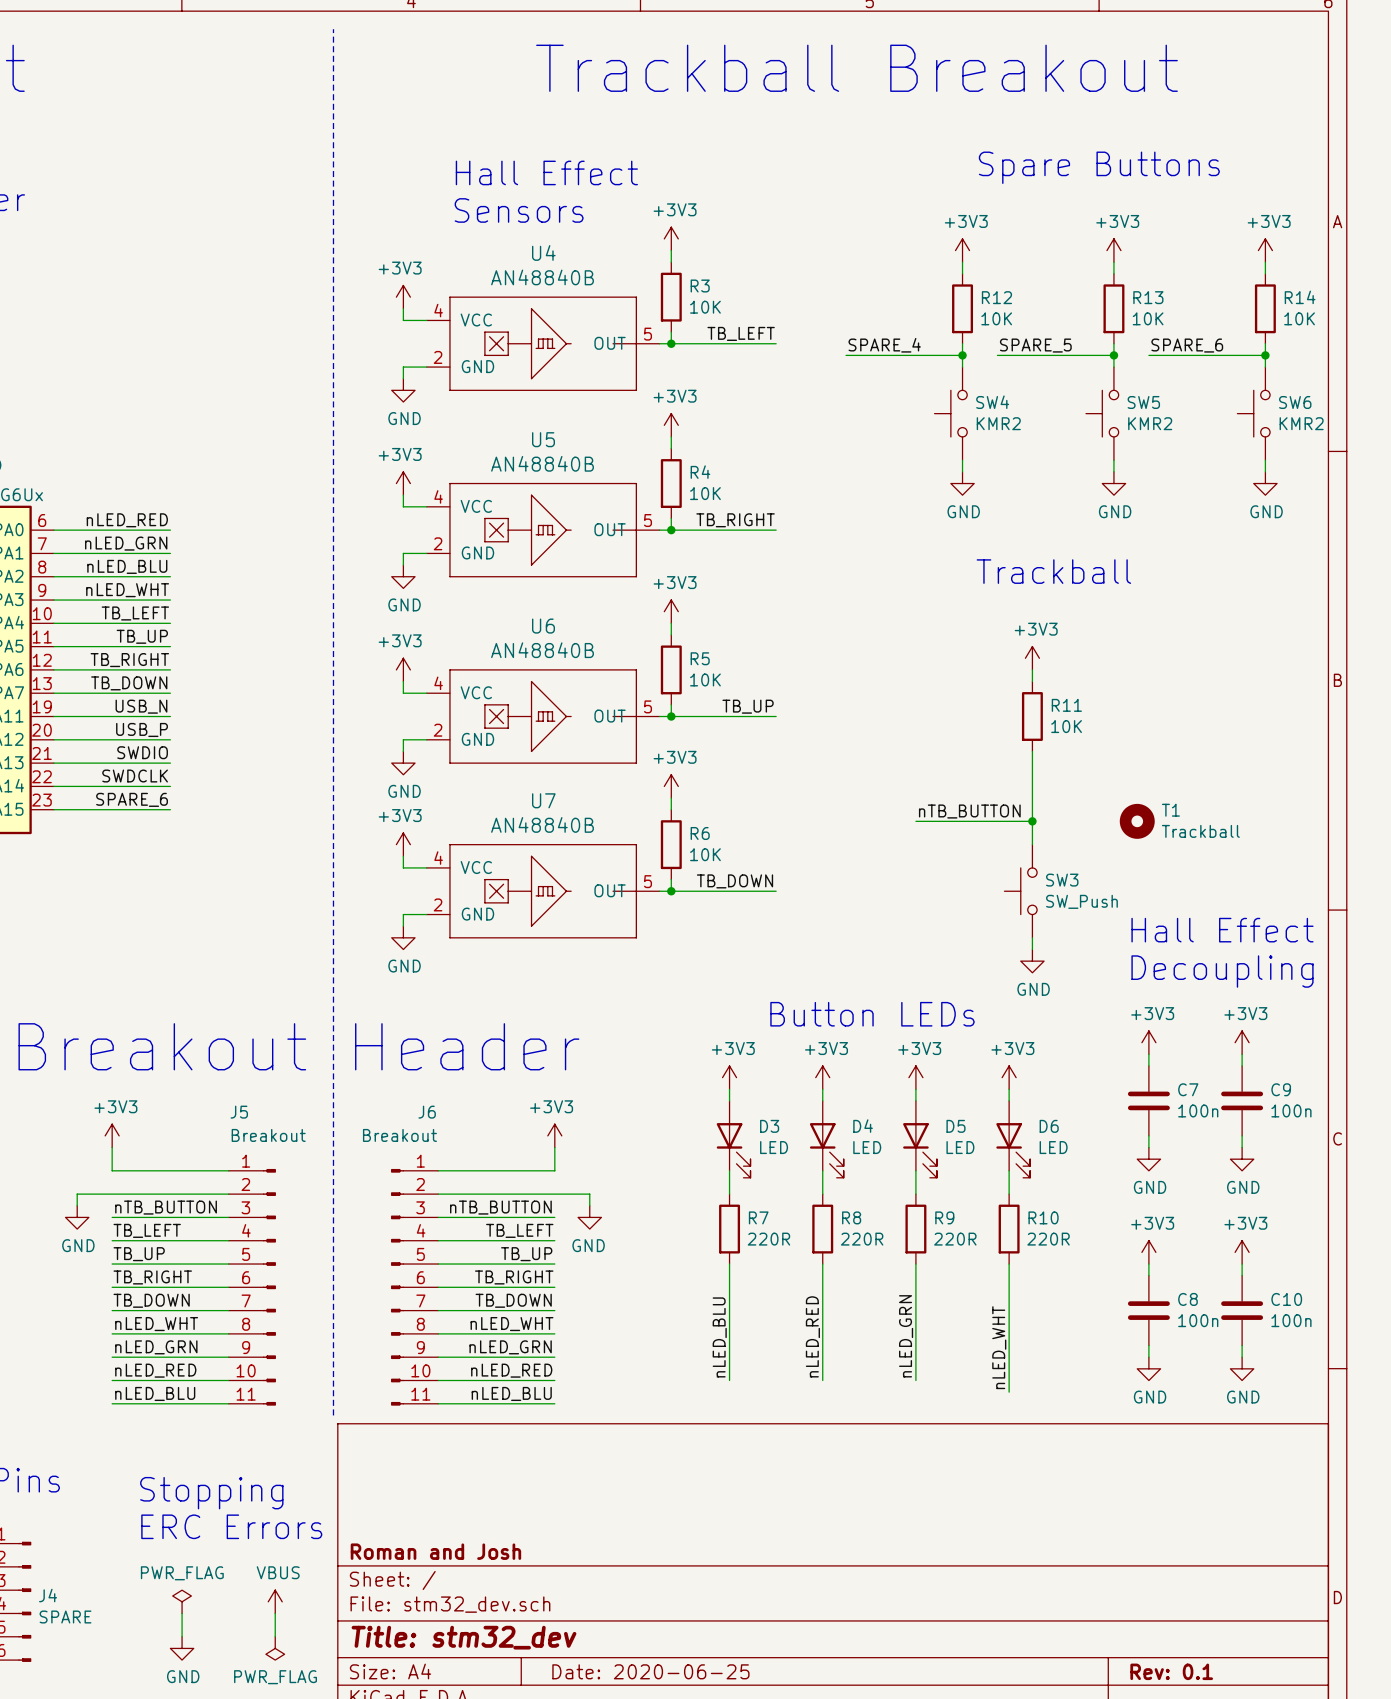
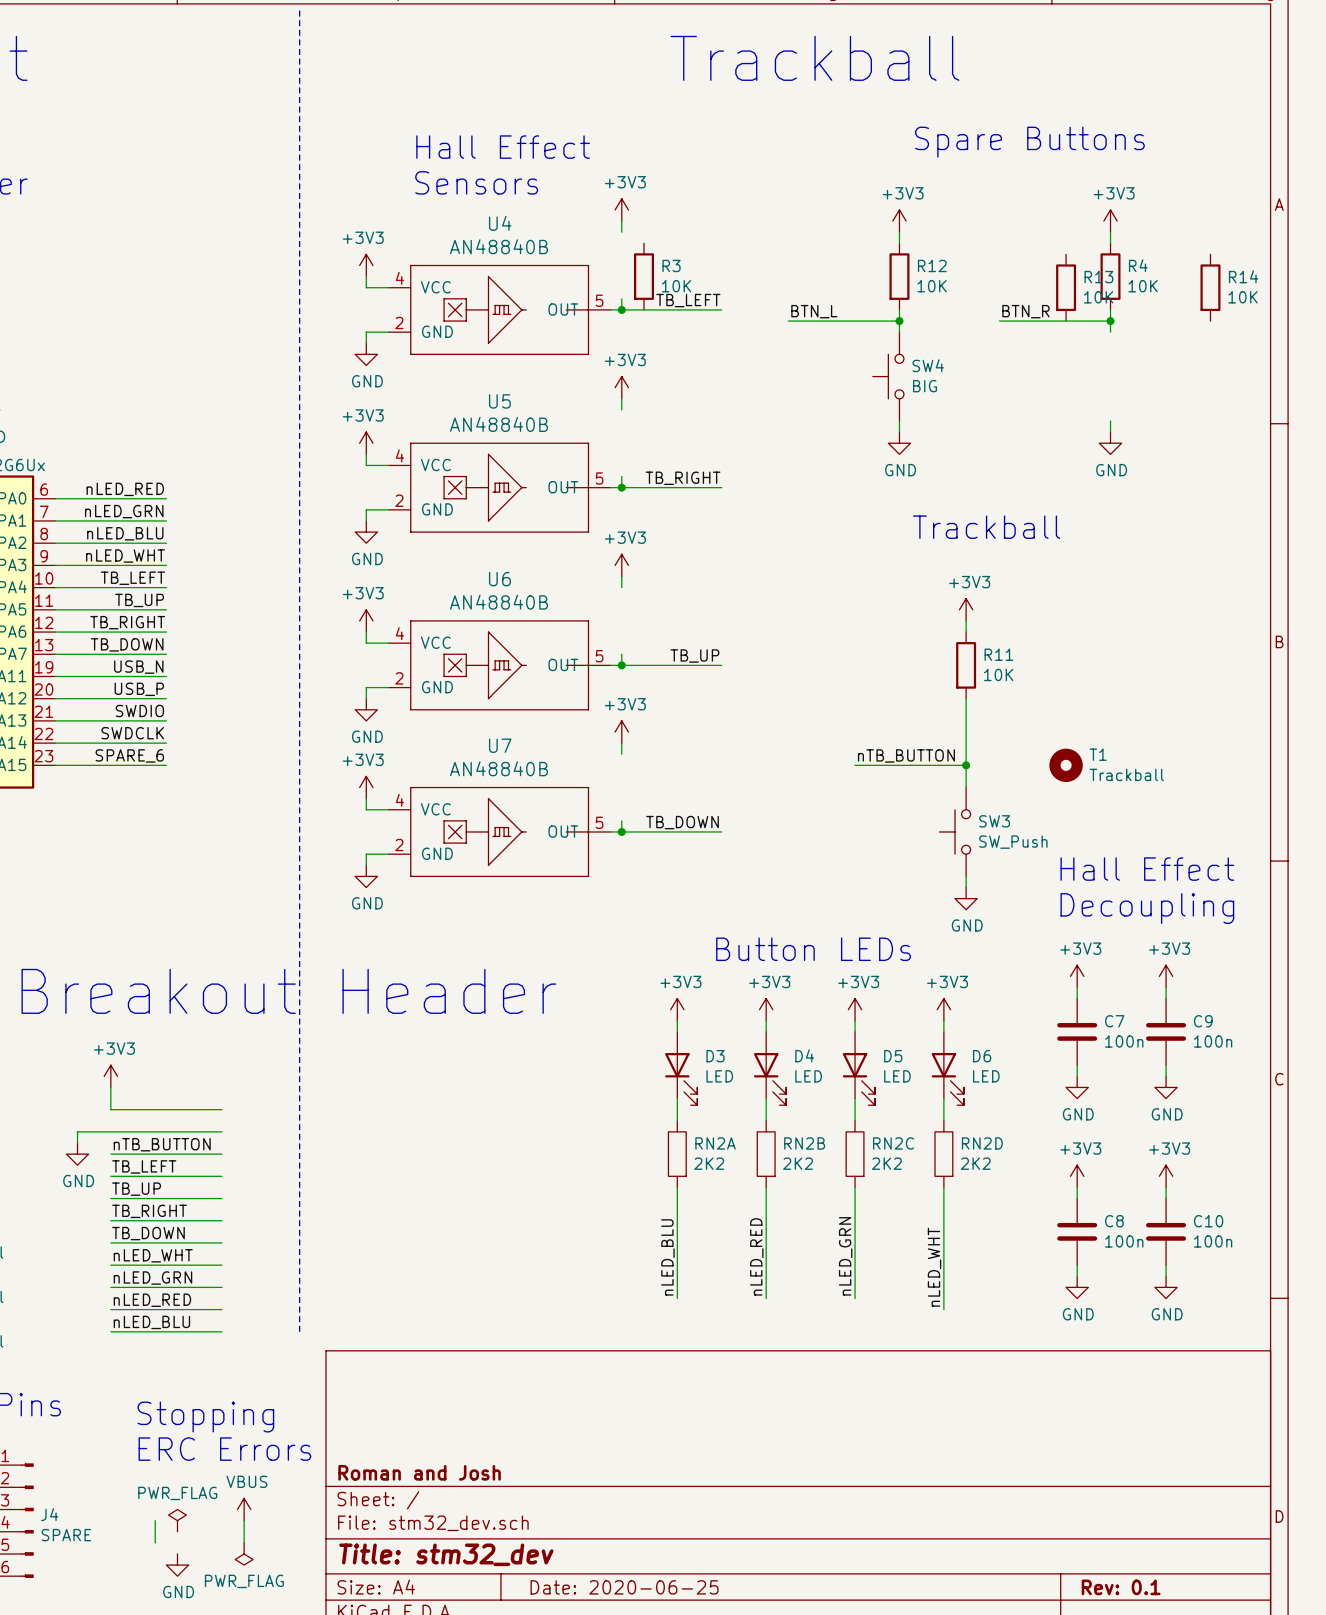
line: (333, 29) (333, 1415) -> (299, 10) (299, 1331)
text: Trackball Breakout (856, 68) -> Trackball (815, 58)
text position: Spare Buttons (1099, 167) -> Spare Buttons (1029, 142)
text position: Hall Effect (546, 172) -> Hall Effect (503, 147)
text position: Sensors (519, 210) -> Sensors (476, 182)
power symbol position: +3V3 (671, 238) -> +3V3 (621, 209)
wire: (671, 250) (671, 262) -> (621, 221) (621, 232)
power symbol position: +3V3 (962, 250) -> +3V3 (899, 221)
power symbol position: +3V3 (1113, 250) -> +3V3 (1110, 221)
power symbol: +3V3 (1265, 250) -> none
wire: (962, 262) (962, 273) -> (899, 232) (899, 243)
wire: (1113, 262) (1113, 273) -> (1110, 232) (1110, 243)
wire: (1265, 262) (1265, 273) -> none
power symbol position: +3V3 (403, 297) -> +3V3 (366, 265)
wire: (403, 308) (403, 320) (426, 320) -> (388, 287) (366, 287) (366, 276)
R12 position: (962, 308) -> (899, 276)
wire: (671, 332) (671, 343) -> (621, 298) (621, 309)
label position: TB_LEFT (741, 333) -> TB_LEFT (688, 300)
label: none -> BTN_L (814, 311)
label: none -> BTN_R (1025, 311)
U4 position: (543, 343) -> (499, 309)
wire: (659, 343) (776, 343) -> (610, 309) (721, 309)
junction position: (671, 343) -> (621, 309)
wire: (962, 343) (962, 367) -> (899, 309) (899, 332)
wire: (1113, 343) (1113, 367) -> (1110, 309) (1110, 332)
wire: (1265, 343) (1265, 367) -> none
label: SPARE_4 (884, 345) -> none
label: SPARE_5 (1035, 345) -> none
label: SPARE_6 (1187, 345) -> none
wire: (846, 355) (962, 355) -> (788, 321) (899, 321)
junction position: (962, 355) -> (899, 321)
wire: (997, 355) (1113, 355) -> (999, 321) (1110, 321)
junction position: (1113, 355) -> (1110, 321)
wire: (1148, 355) (1265, 355) -> none
junction: (1265, 355) -> none
wire: (426, 367) (403, 367) (403, 378) -> (388, 332) (366, 332) (366, 343)
power symbol position: GND (403, 390) -> GND (366, 354)
SW4 position: (950, 413) -> (888, 376)
SW5: KMR2 (1102, 413) -> none
SW6: KMR2 (1253, 413) -> none
SW4 value: KMR2 (998, 423) -> BIG (925, 386)
power symbol position: +3V3 (671, 425) -> +3V3 (621, 387)
wire: (671, 436) (671, 448) -> (621, 398) (621, 409)
wire: (962, 460) (962, 471) -> (899, 421) (899, 432)
wire: (1113, 460) (1113, 471) -> (1110, 421) (1110, 432)
wire: (1265, 460) (1265, 471) -> none
power symbol position: +3V3 (403, 483) -> +3V3 (366, 443)
R4 position: (671, 483) -> (1110, 276)
power symbol position: GND (962, 483) -> GND (899, 443)
power symbol position: GND (1113, 483) -> GND (1110, 443)
power symbol: GND (1265, 483) -> none
wire: (403, 495) (403, 506) (426, 506) -> (388, 465) (366, 465) (366, 454)
wire: (671, 518) (671, 530) -> (621, 476) (621, 487)
label position: TB_RIGHT (735, 520) -> TB_RIGHT (683, 478)
U5 position: (543, 530) -> (499, 487)
wire: (659, 530) (776, 530) -> (610, 487) (721, 487)
junction position: (671, 530) -> (621, 487)
wire: (426, 553) (403, 553) (403, 565) -> (388, 509) (366, 509) (366, 520)
text position: Trackball (1053, 571) -> Trackball (986, 527)
power symbol position: GND (403, 576) -> GND (366, 532)
power symbol position: +3V3 (671, 611) -> +3V3 (621, 565)
wire: (671, 623) (671, 634) -> (621, 576) (621, 587)
power symbol position: +3V3 (1032, 658) -> +3V3 (966, 609)
power symbol position: +3V3 (403, 669) -> +3V3 (366, 620)
R5: 10K (671, 669) -> none
wire: (1032, 669) (1032, 681) -> (966, 620) (966, 632)
wire: (403, 681) (403, 693) (426, 693) -> (388, 643) (366, 643) (366, 632)
wire: (671, 704) (671, 716) -> (621, 654) (621, 665)
label position: TB_UP (748, 706) -> TB_UP (694, 655)
U6 position: (543, 716) -> (499, 665)
wire: (659, 716) (776, 716) -> (610, 665) (721, 665)
junction position: (671, 716) -> (621, 665)
R11 position: (1032, 716) -> (966, 665)
wire: (426, 739) (403, 739) (403, 751) -> (388, 687) (366, 687) (366, 698)
wire: (1032, 751) (1032, 844) -> (966, 698) (966, 787)
power symbol position: GND (403, 763) -> GND (366, 709)
power symbol position: +3V3 (671, 786) -> +3V3 (621, 732)
wire: (671, 798) (671, 809) -> (621, 743) (621, 754)
label position: nTB_BUTTON (969, 811) -> nTB_BUTTON (906, 755)
wire: (915, 821) (1032, 821) -> (855, 765) (966, 765)
junction position: (1032, 821) -> (966, 765)
T1 position: (1137, 821) -> (1066, 765)
power symbol position: +3V3 (403, 844) -> +3V3 (366, 787)
R6: 10K (671, 844) -> none
wire: (403, 856) (403, 867) (426, 867) -> (388, 809) (366, 809) (366, 798)
wire: (671, 879) (671, 891) -> (621, 820) (621, 831)
label position: TB_DOWN (735, 881) -> TB_DOWN (682, 822)
U7 position: (543, 891) -> (499, 831)
wire: (659, 891) (776, 891) -> (610, 831) (721, 831)
junction position: (671, 891) -> (621, 831)
SW3 position: (1020, 891) -> (955, 831)
wire: (426, 914) (403, 914) (403, 926) -> (388, 854) (366, 854) (366, 865)
text position: Hall Effect (1222, 930) -> Hall Effect (1147, 869)
power symbol position: GND (403, 937) -> GND (366, 876)
wire: (1032, 937) (1032, 949) -> (966, 876) (966, 887)
power symbol position: GND (1032, 961) -> GND (966, 898)
text position: Decoupling (1222, 971) -> Decoupling (1147, 908)
text position: Button LEDs (872, 1014) -> Button LEDs (813, 949)
power symbol position: +3V3 (1148, 1042) -> +3V3 (1077, 976)
power symbol position: +3V3 (1242, 1042) -> +3V3 (1166, 976)
wire: (1148, 1054) (1148, 1065) -> (1077, 987) (1077, 998)
wire: (1242, 1054) (1242, 1065) -> (1166, 987) (1166, 998)
power symbol position: +3V3 (729, 1077) -> +3V3 (677, 1009)
power symbol position: +3V3 (822, 1077) -> +3V3 (766, 1009)
power symbol position: +3V3 (915, 1077) -> +3V3 (855, 1009)
power symbol position: +3V3 (1009, 1077) -> +3V3 (943, 1009)
wire: (729, 1089) (729, 1100) -> (677, 1020) (677, 1031)
wire: (822, 1089) (822, 1100) -> (766, 1020) (766, 1031)
wire: (915, 1089) (915, 1100) -> (855, 1020) (855, 1031)
wire: (1009, 1089) (1009, 1100) -> (943, 1020) (943, 1031)
C7 position: (1148, 1100) -> (1077, 1031)
C9 position: (1242, 1100) -> (1166, 1031)
power symbol: +3V3 (554, 1135) -> none
wire: (1148, 1135) (1148, 1147) -> (1077, 1065) (1077, 1076)
wire: (1242, 1135) (1242, 1147) -> (1166, 1065) (1166, 1076)
D3 position: (733, 1139) -> (681, 1068)
D4 position: (826, 1139) -> (770, 1068)
D5 position: (920, 1139) -> (858, 1068)
D6 position: (1013, 1139) -> (947, 1068)
wire: (554, 1147) (554, 1170) (438, 1170) -> none
power symbol position: GND (1148, 1159) -> GND (1077, 1087)
power symbol position: GND (1242, 1159) -> GND (1166, 1087)
wire: (729, 1170) (729, 1194) -> (677, 1098) (677, 1120)
wire: (822, 1170) (822, 1194) -> (766, 1098) (766, 1120)
wire: (915, 1170) (915, 1194) -> (855, 1098) (855, 1120)
wire: (1009, 1170) (1009, 1194) -> (943, 1098) (943, 1120)
wire: (438, 1194) (589, 1194) (589, 1205) -> none
label: nTB_BUTTON (500, 1207) -> none
wire: (438, 1217) (554, 1217) -> none
power symbol: GND (589, 1217) -> none
RN2A: none -> 2K2 (677, 1154)
RN2B: none -> 2K2 (766, 1154)
RN2C: none -> 2K2 (855, 1154)
RN2D: none -> 2K2 (943, 1154)
R7: 220R (729, 1229) -> none
R8: 220R (822, 1229) -> none
R9: 220R (915, 1229) -> none
R10: 220R (1009, 1229) -> none
label: TB_LEFT (519, 1230) -> none
wire: (438, 1240) (554, 1240) -> none
power symbol position: +3V3 (1148, 1252) -> +3V3 (1077, 1176)
power symbol position: +3V3 (1242, 1252) -> +3V3 (1166, 1176)
label: TB_UP (526, 1254) -> none
wire: (438, 1264) (554, 1264) -> none
wire: (729, 1264) (729, 1380) -> (677, 1187) (677, 1298)
wire: (822, 1264) (822, 1380) -> (766, 1187) (766, 1298)
wire: (915, 1264) (915, 1380) -> (855, 1187) (855, 1298)
wire: (1009, 1264) (1009, 1392) -> (943, 1187) (943, 1309)
wire: (1148, 1264) (1148, 1275) -> (1077, 1187) (1077, 1198)
wire: (1242, 1264) (1242, 1275) -> (1166, 1187) (1166, 1198)
label: TB_RIGHT (514, 1277) -> none
J5: Breakout (252, 1287) -> none
J6: Breakout (414, 1287) -> none
wire: (438, 1287) (554, 1287) -> none
label: TB_DOWN (513, 1300) -> none
wire: (438, 1310) (554, 1310) -> none
C8 position: (1148, 1310) -> (1077, 1231)
C10 position: (1242, 1310) -> (1166, 1231)
label: nLED_WHT (512, 1324) -> none
wire: (438, 1333) (554, 1333) -> none
label position: nLED_RED (812, 1336) -> nLED_RED (756, 1256)
label position: nLED_GRN (906, 1336) -> nLED_GRN (845, 1256)
label position: nLED_BLU (719, 1337) -> nLED_BLU (667, 1257)
wire: (1148, 1345) (1148, 1357) -> (1077, 1265) (1077, 1276)
wire: (1242, 1345) (1242, 1357) -> (1166, 1265) (1166, 1276)
label: nLED_GRN (510, 1347) -> none
label position: nLED_WHT (999, 1347) -> nLED_WHT (934, 1267)
wire: (438, 1357) (554, 1357) -> none
power symbol position: GND (1148, 1368) -> GND (1077, 1287)
power symbol position: GND (1242, 1368) -> GND (1166, 1287)
label: nLED_RED (511, 1370) -> none
wire: (438, 1380) (554, 1380) -> none
label: nLED_BLU (511, 1393) -> none
wire: (438, 1403) (554, 1403) -> none
power symbol position: VBUS (275, 1601) -> VBUS (244, 1509)
wire: (182, 1613) (182, 1636) -> (155, 1520) (155, 1542)
wire: (275, 1613) (275, 1636) -> (244, 1520) (244, 1542)
power symbol position: PWR_FLAG (275, 1648) -> PWR_FLAG (244, 1553)

